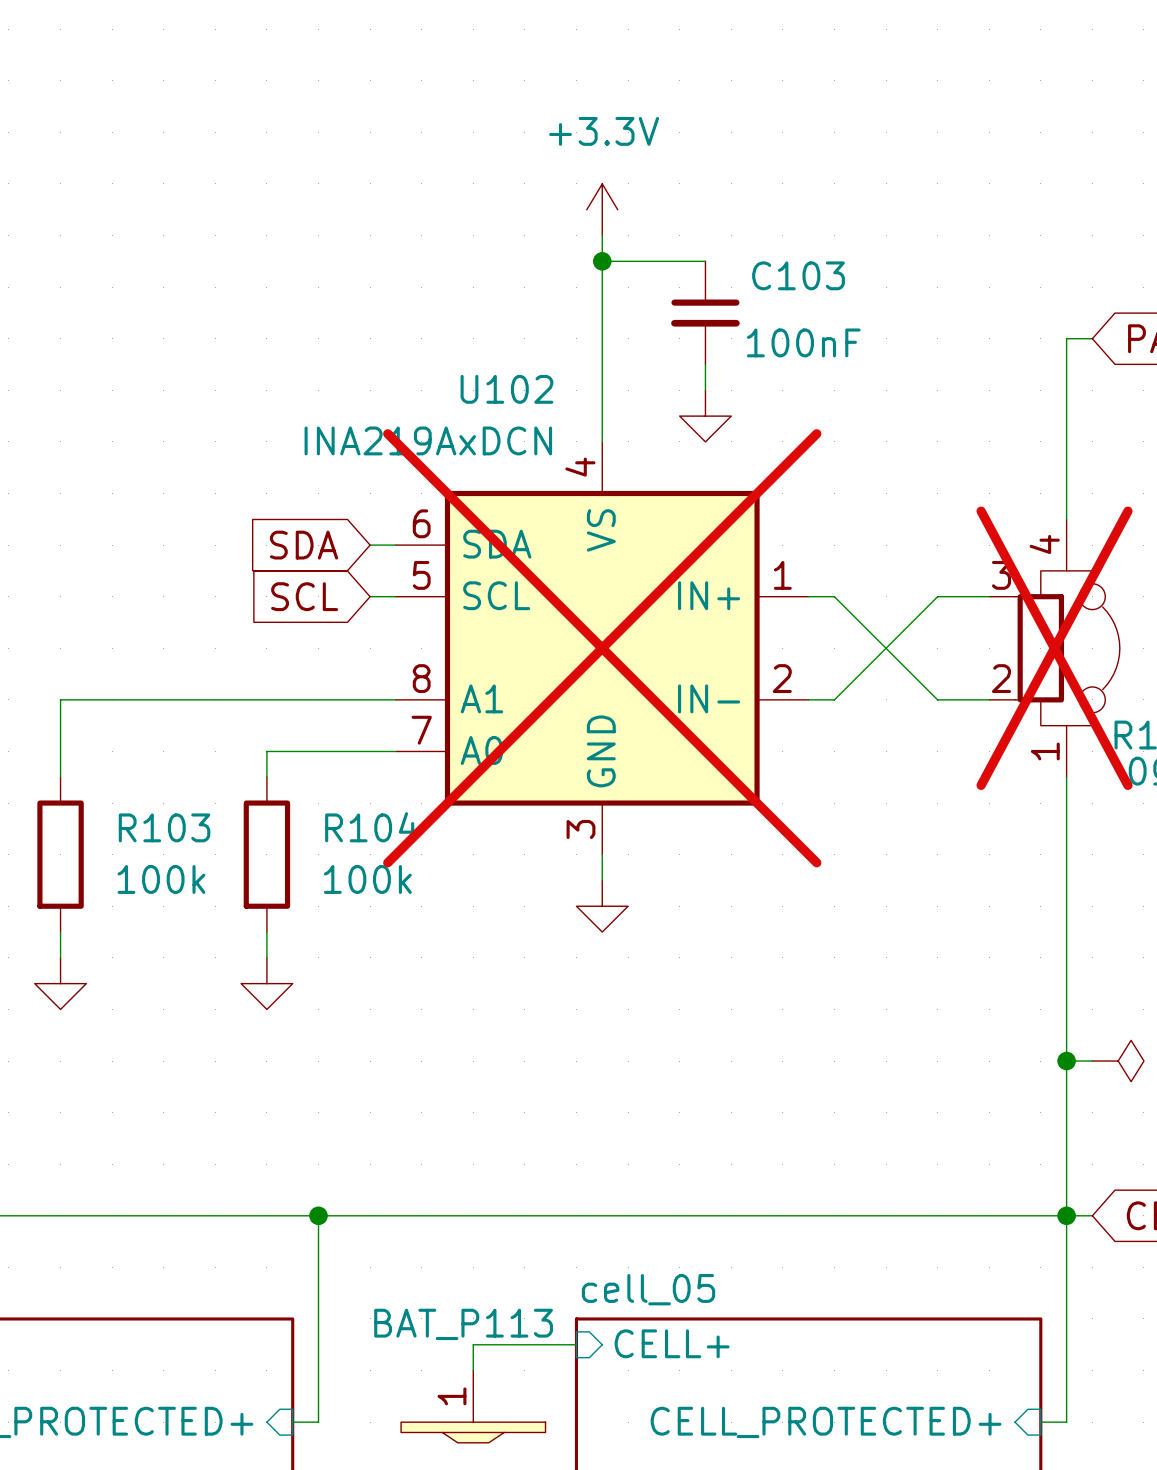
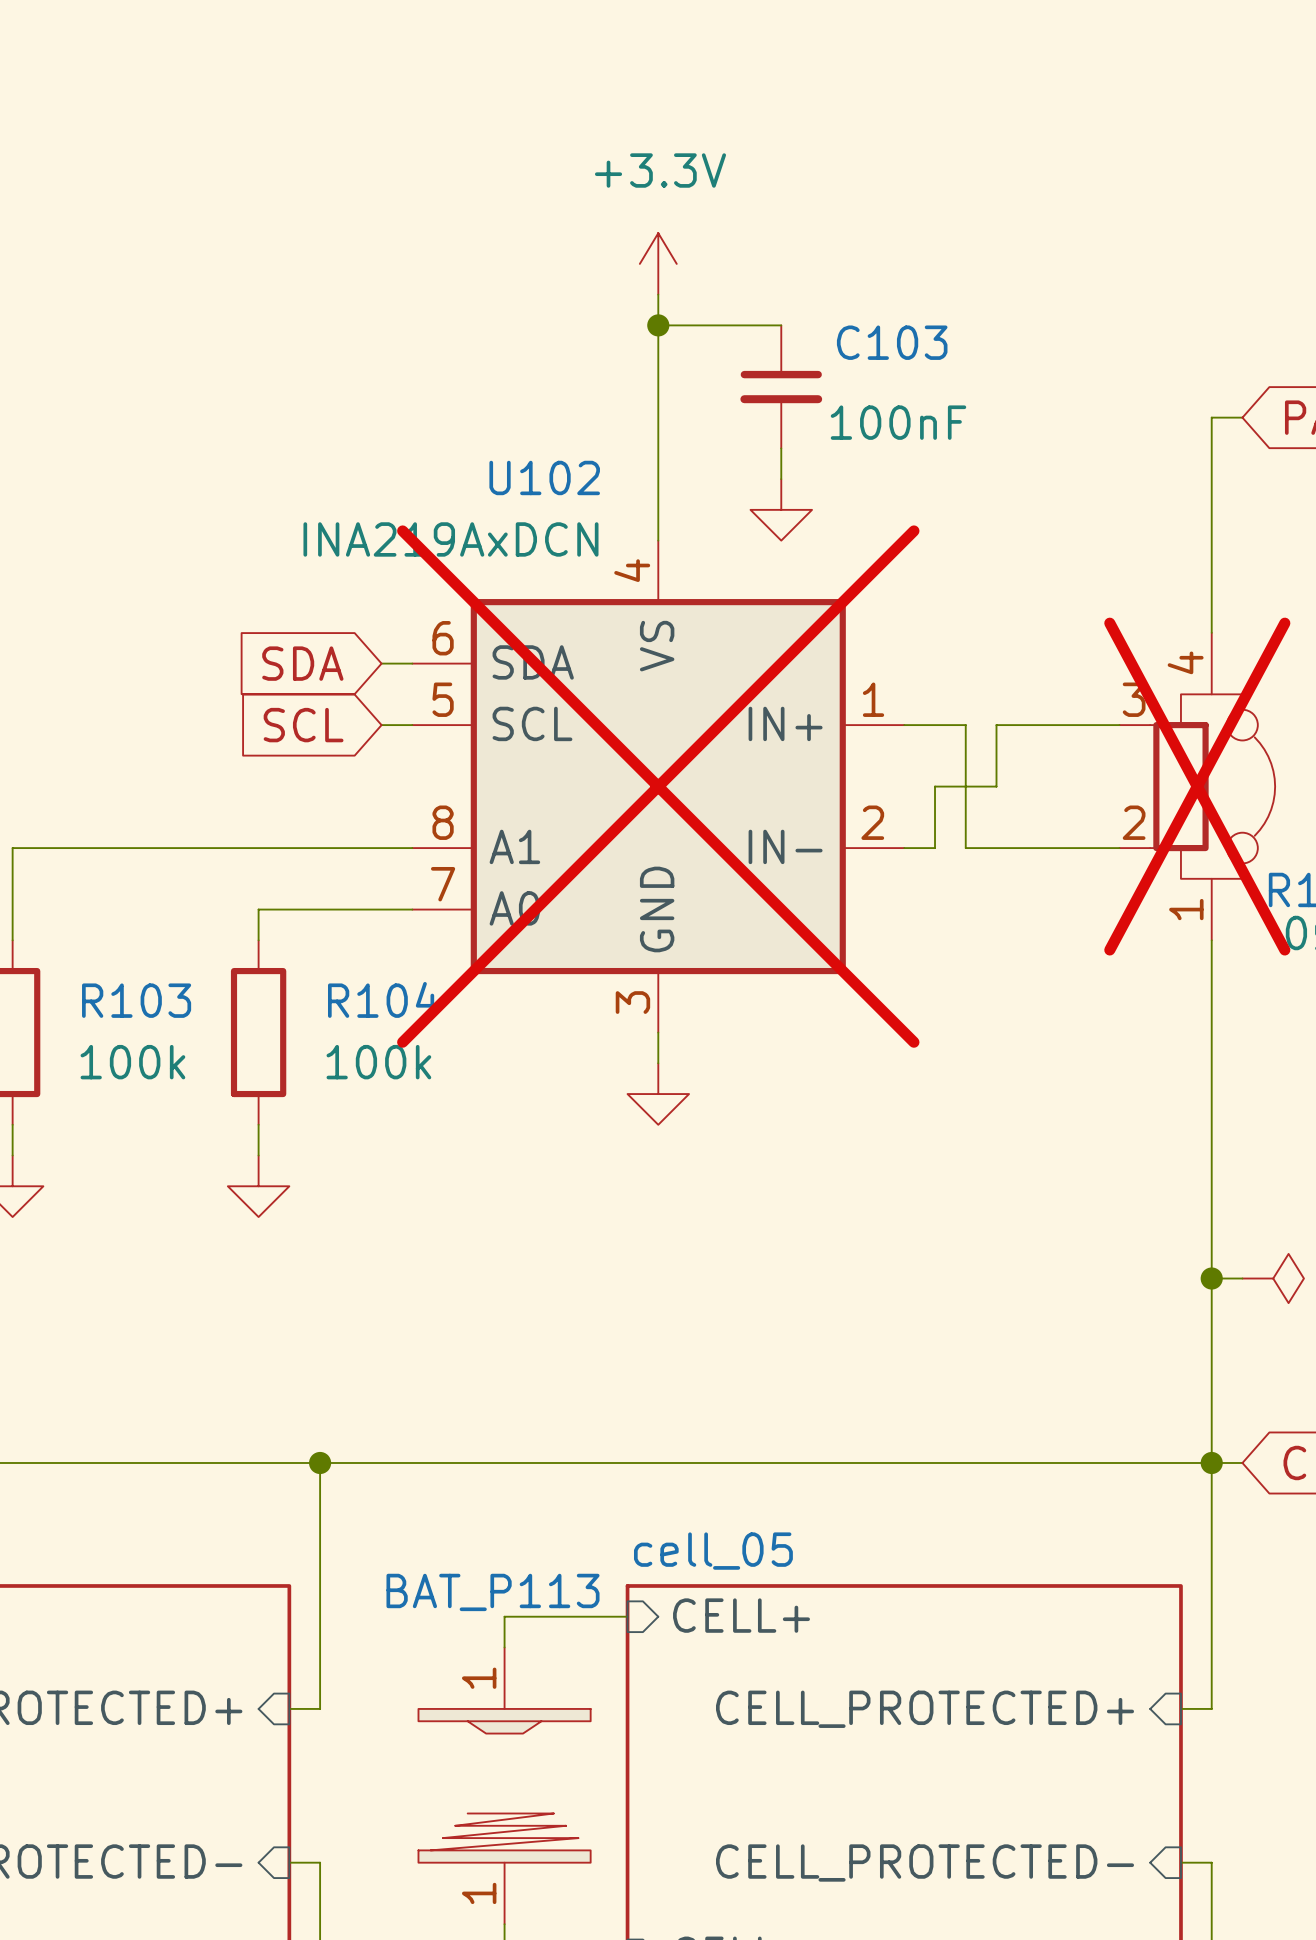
wire: (834, 596) (937, 699) -> (935, 725) (965, 725) (965, 848) (1057, 848)
wire: (937, 596) (834, 699) -> (1057, 725) (996, 725) (996, 786) (935, 786) (935, 848)

